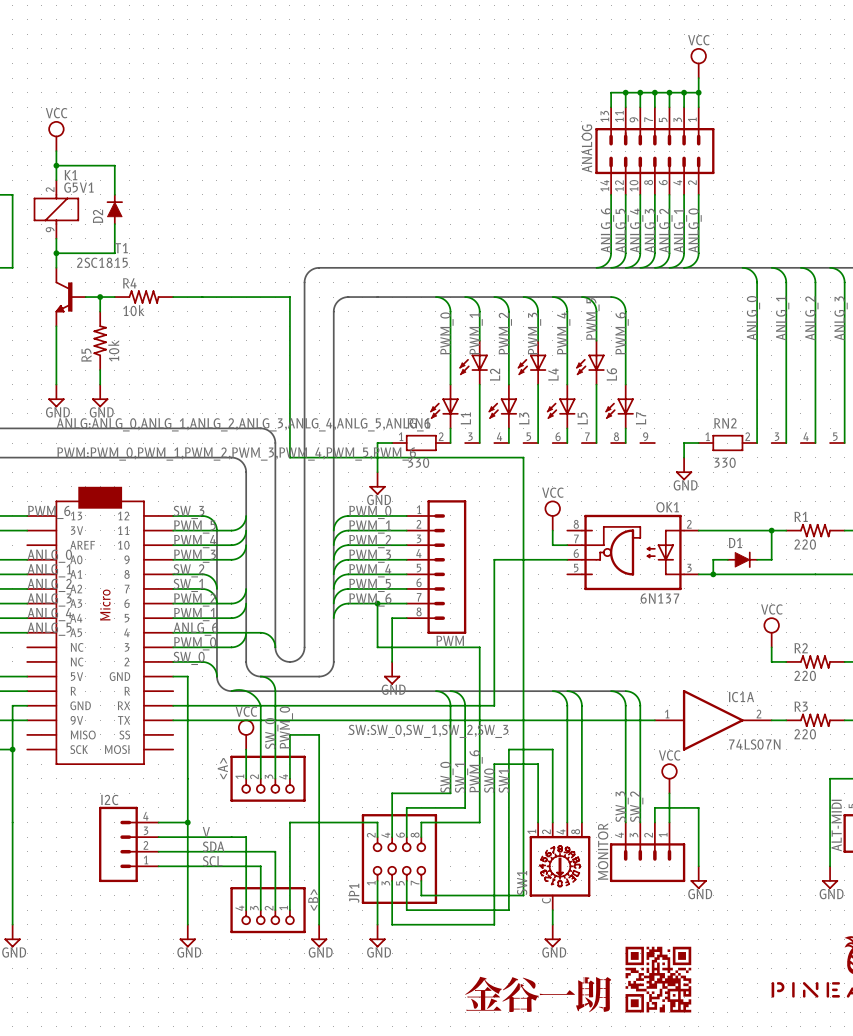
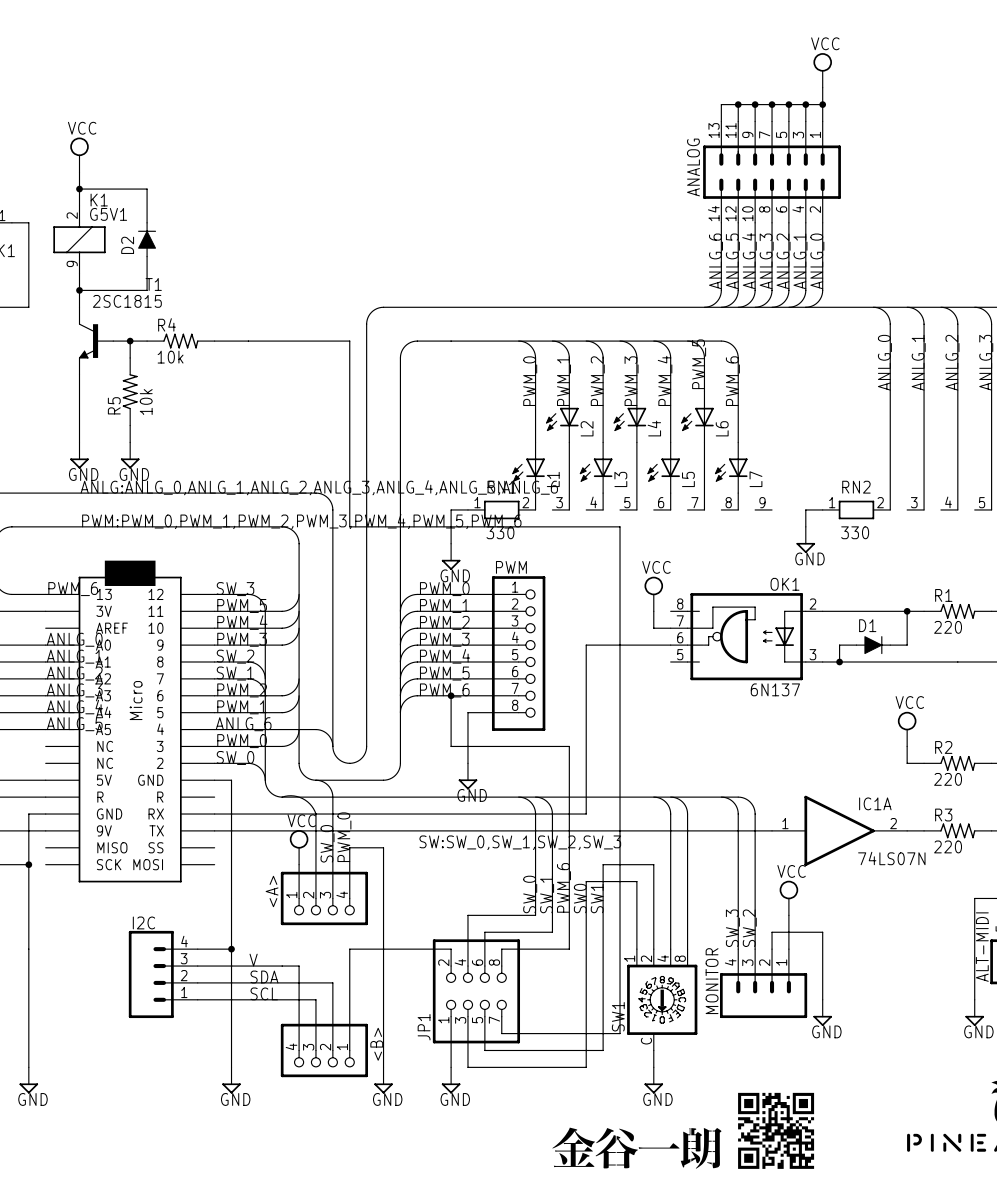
PWM symbol: [406, 500, 467, 634] -> [491, 576, 546, 731]
PWM name position: PWM (450, 640) -> PWM (511, 567)

